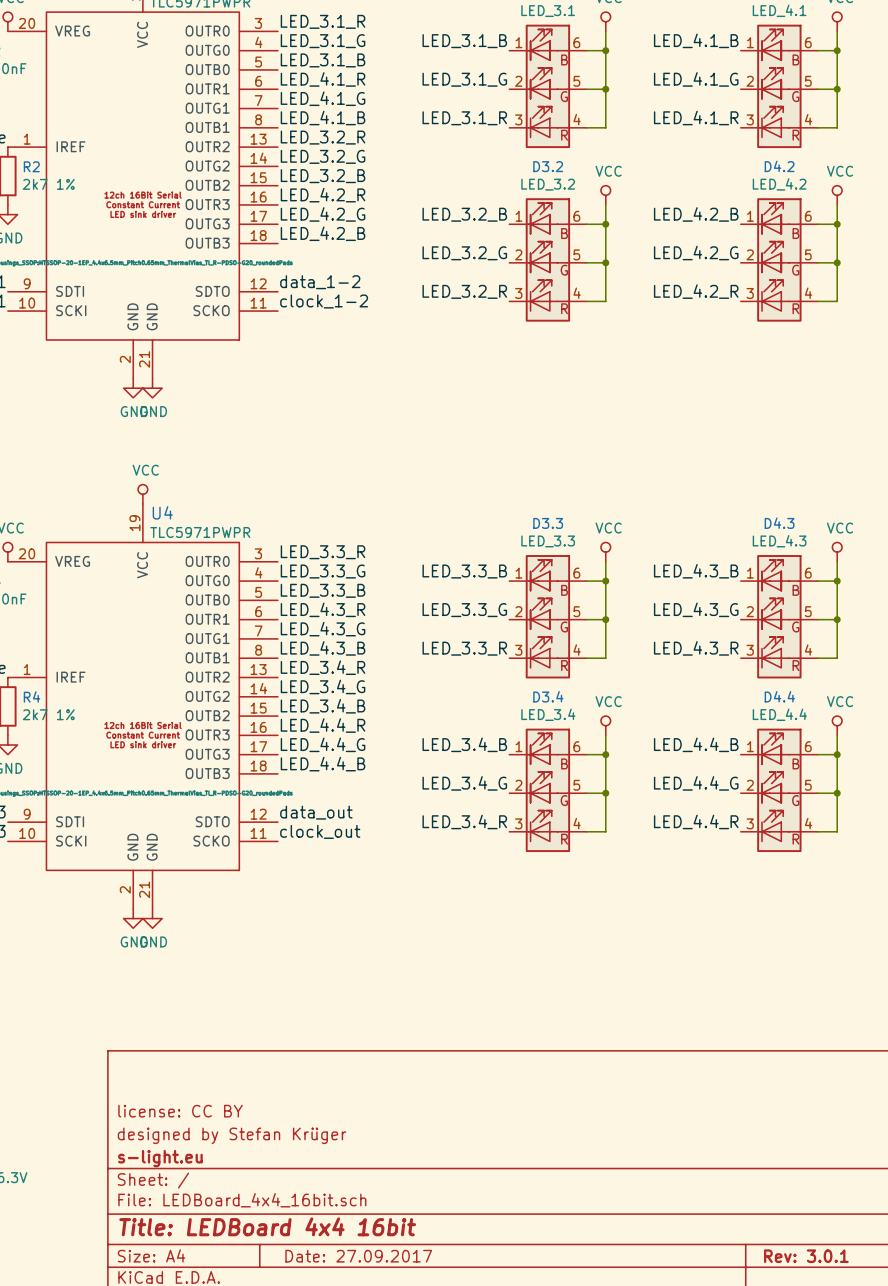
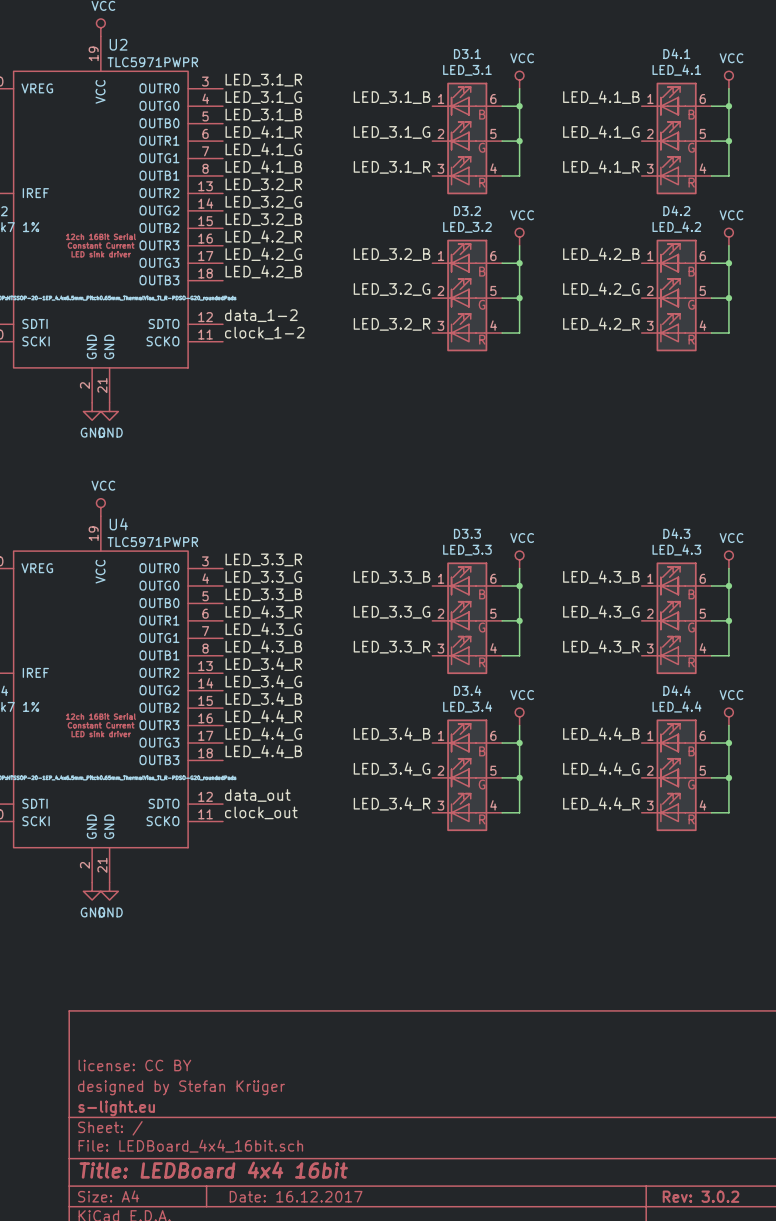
title block: Date: 27.09.2017 (358, 1256) -> Date: 16.12.2017 (296, 1196)
title block: Rev: 3.0.1 (806, 1256) -> Rev: 3.0.2 (701, 1196)

